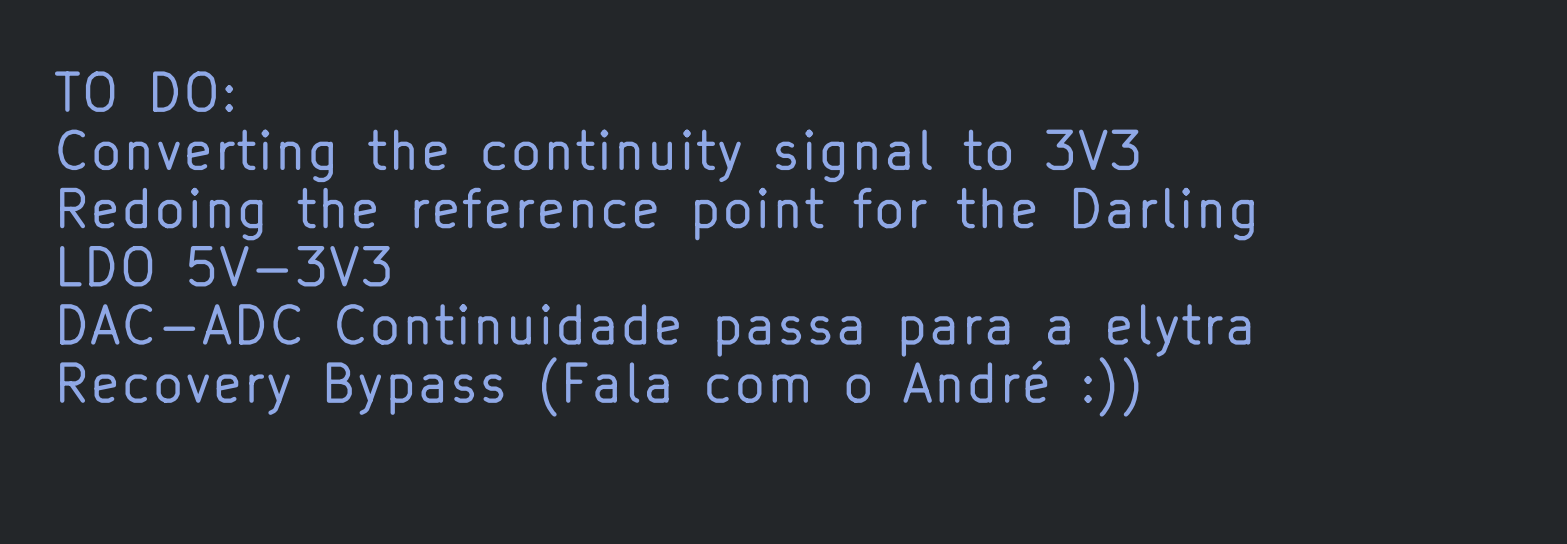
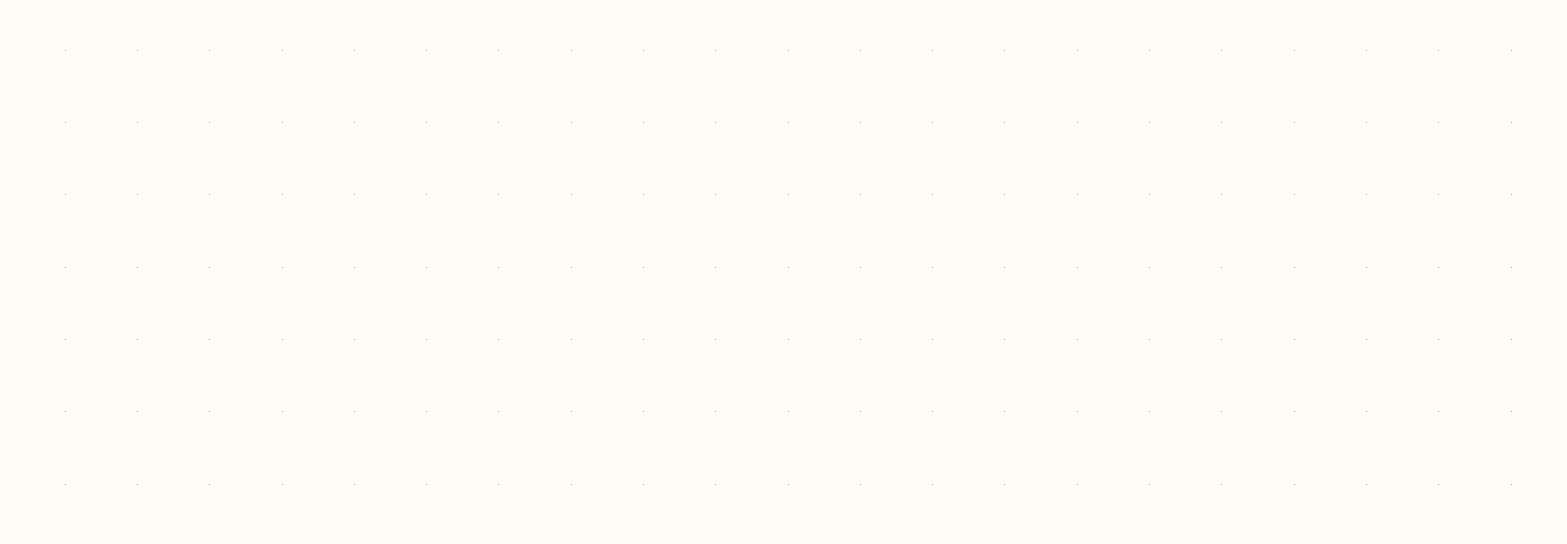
text: TO DO: (144, 91) -> none
text: Converting the continuity signal to 3V3 (598, 155) -> none
text: Redoing the reference point for the Darling (656, 214) -> none
text: LDO 5V-3V3 (224, 266) -> none
text: DAC-ADC Continuidade passa para a elytra (655, 330) -> none
text: Recovery Bypass (Fala com o André :)) (599, 386) -> none

